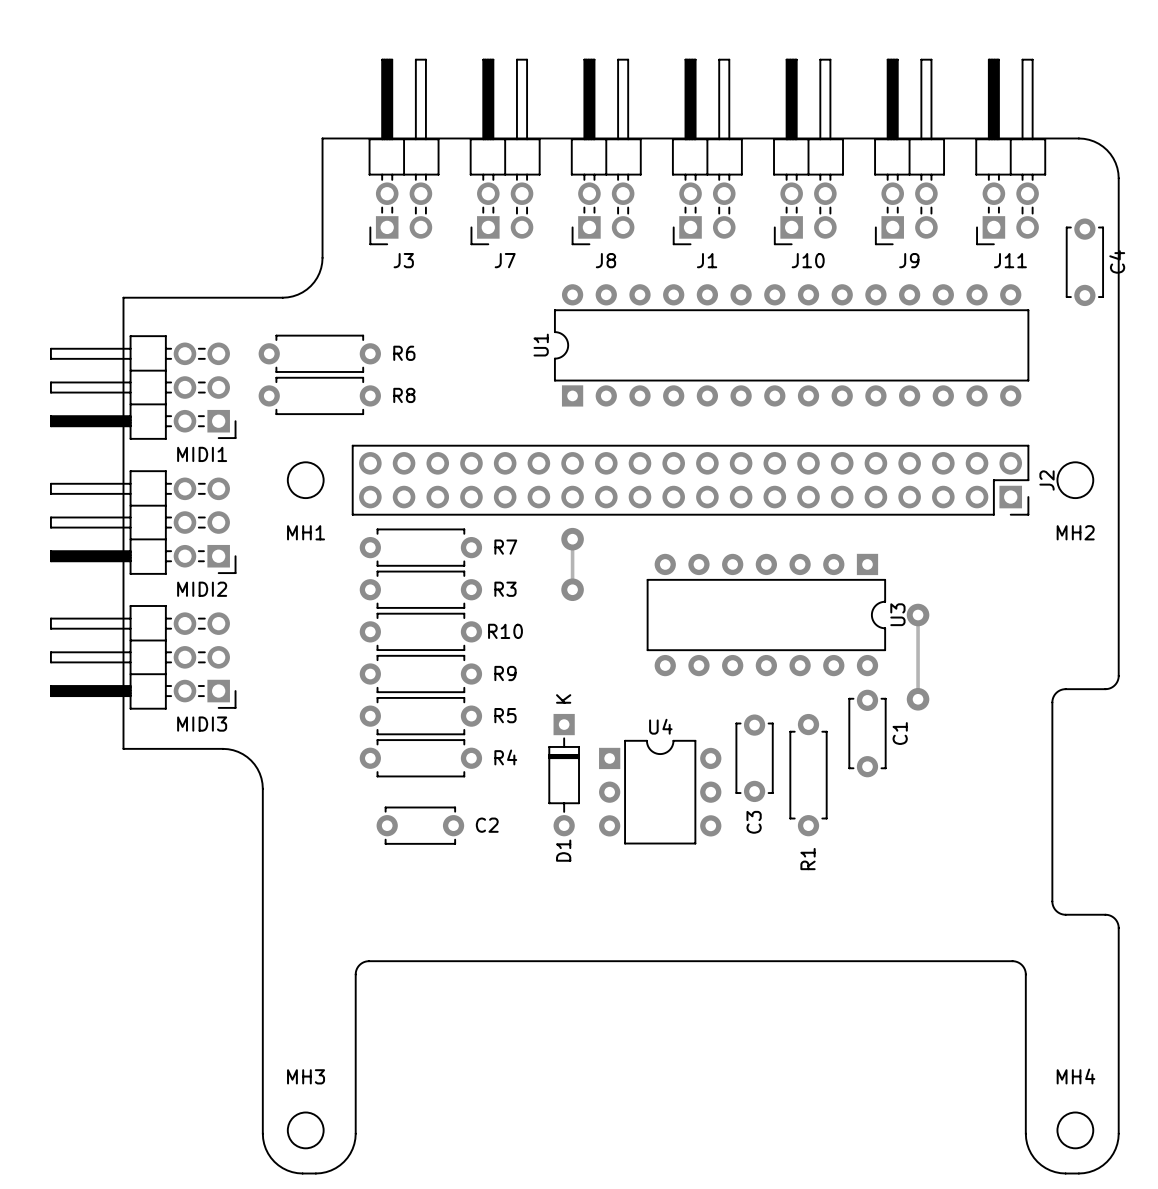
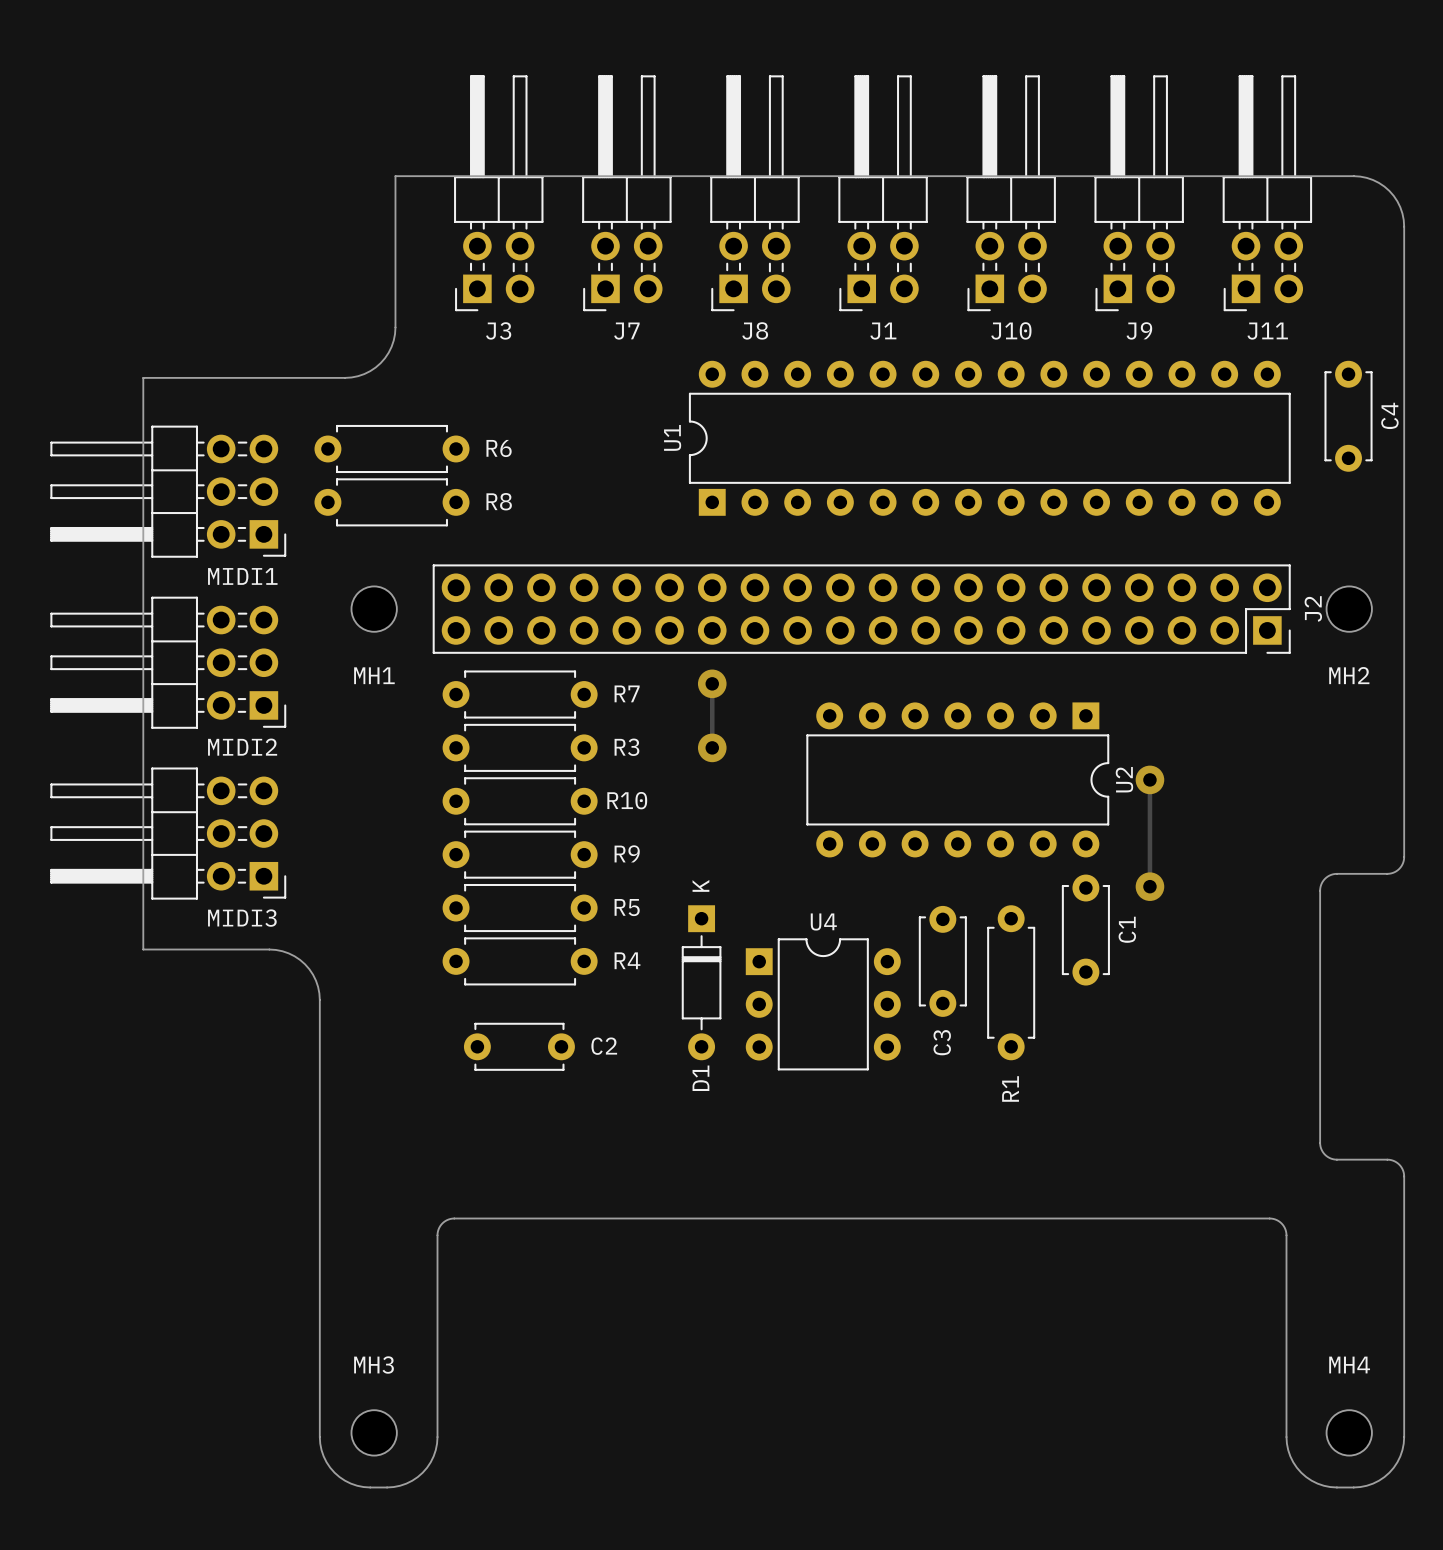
C4 position: (1084, 262) -> (1348, 416)
U3 name: U3 (897, 614) -> U2 (1124, 779)

